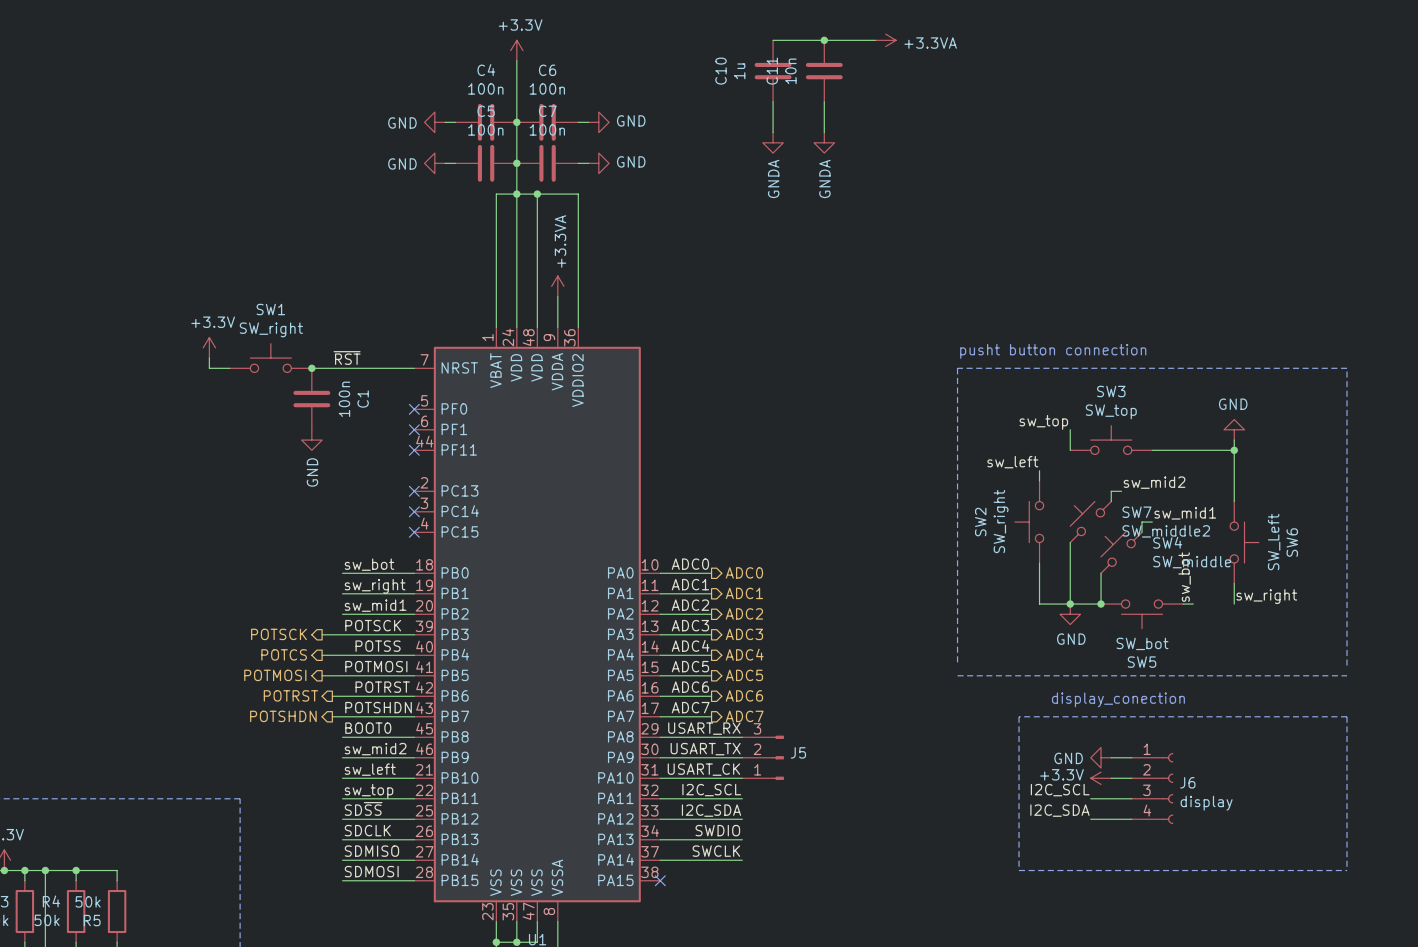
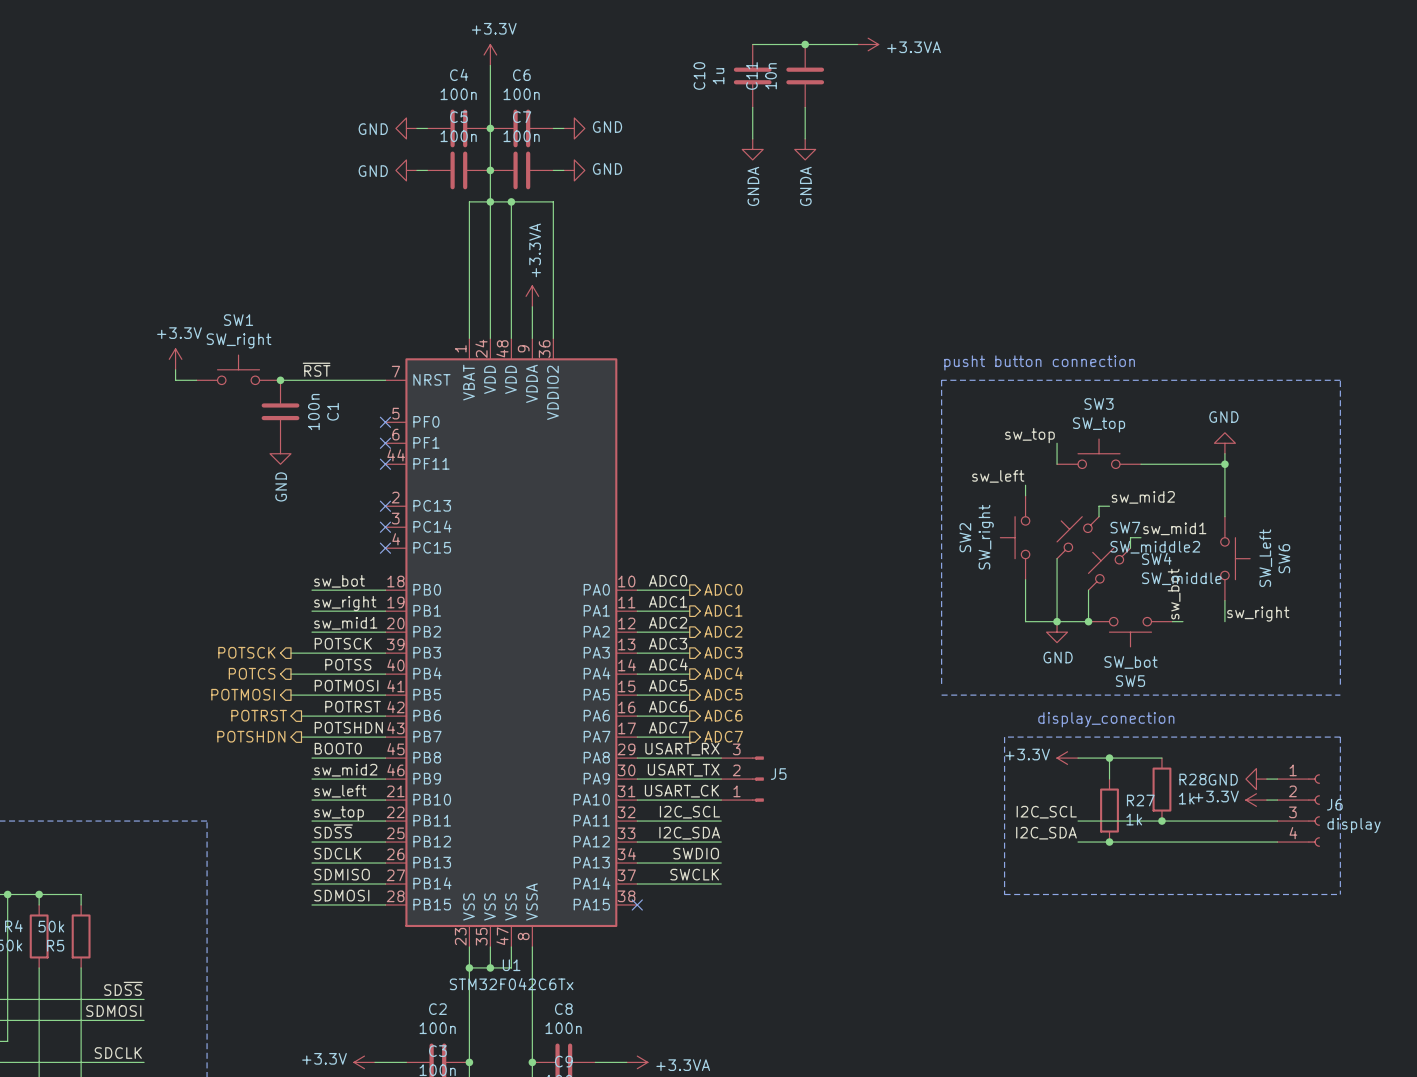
wire: none -> (1078, 758) (1161, 758)
wire: none -> (1109, 758) (1109, 779)
junction: none -> (1109, 758)
power symbol position: GND (1101, 757) -> GND (1256, 779)
wire: (1111, 757) (1131, 757) -> none
wire: none -> (1266, 779) (1277, 779)
R28: none -> 1k (1161, 789)
power symbol position: +3.3V (1101, 778) -> +3.3V (1067, 758)
wire: (1111, 778) (1131, 778) -> none
power symbol: none -> +3.3V (1256, 800)
wire: none -> (1266, 800) (1277, 800)
R27: none -> 1k (1109, 810)
J6 position: (1152, 788) -> (1298, 810)
wire: none -> (1120, 821) (1277, 821)
junction: none -> (1161, 821)
junction: none -> (1109, 842)
wire: none -> (1120, 842) (1277, 842)

